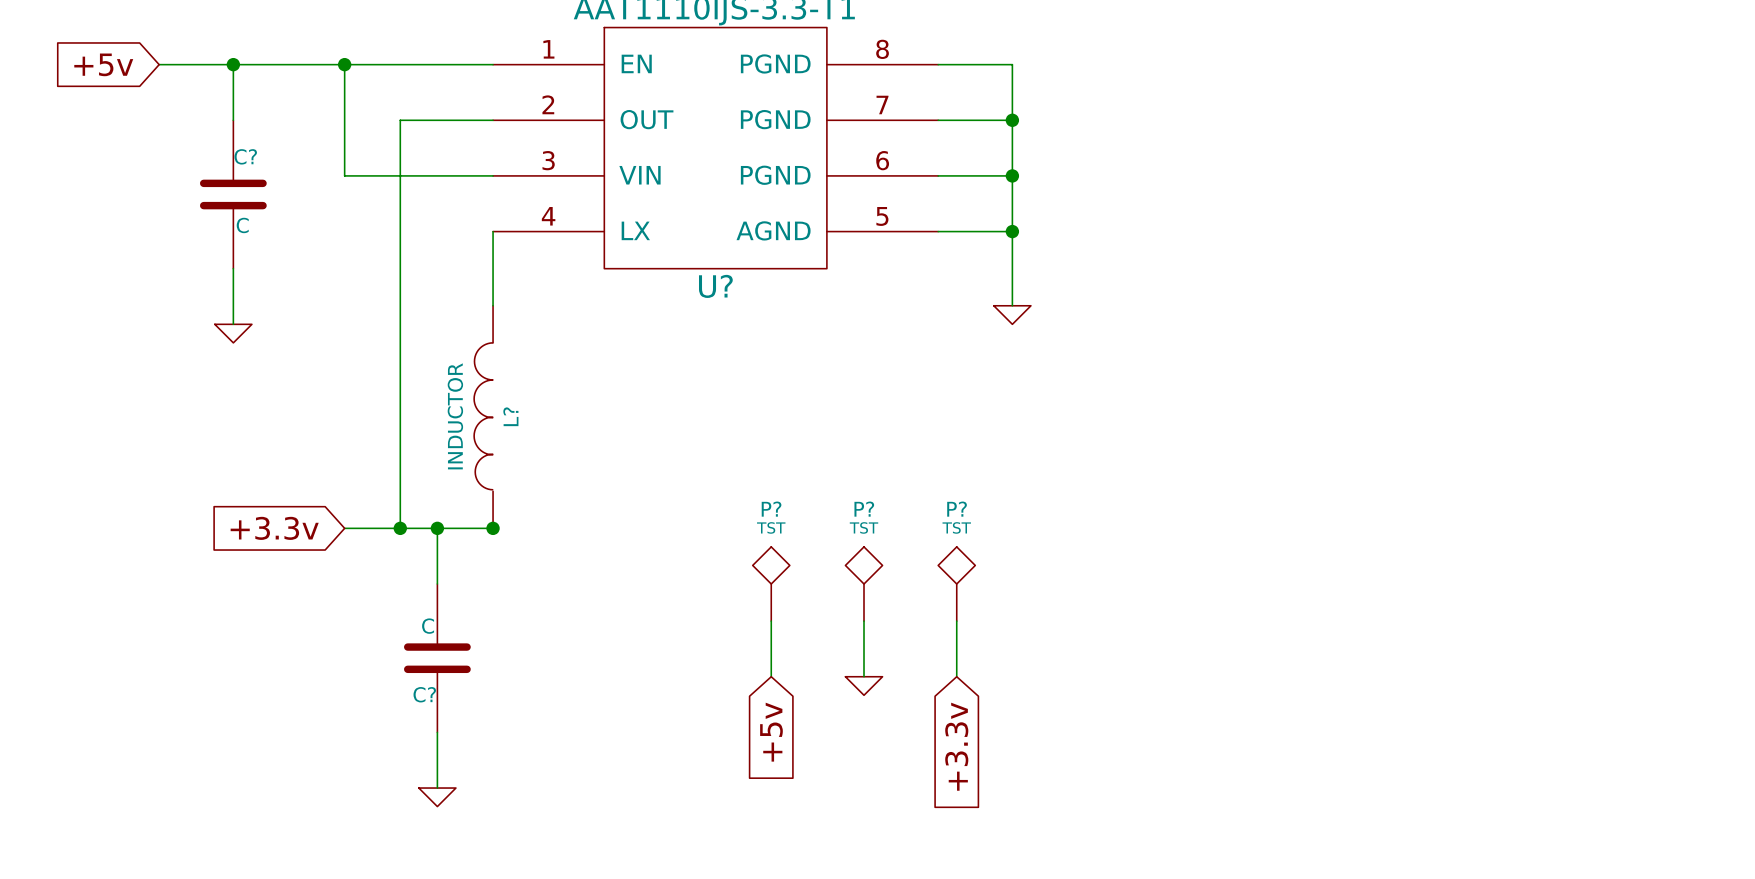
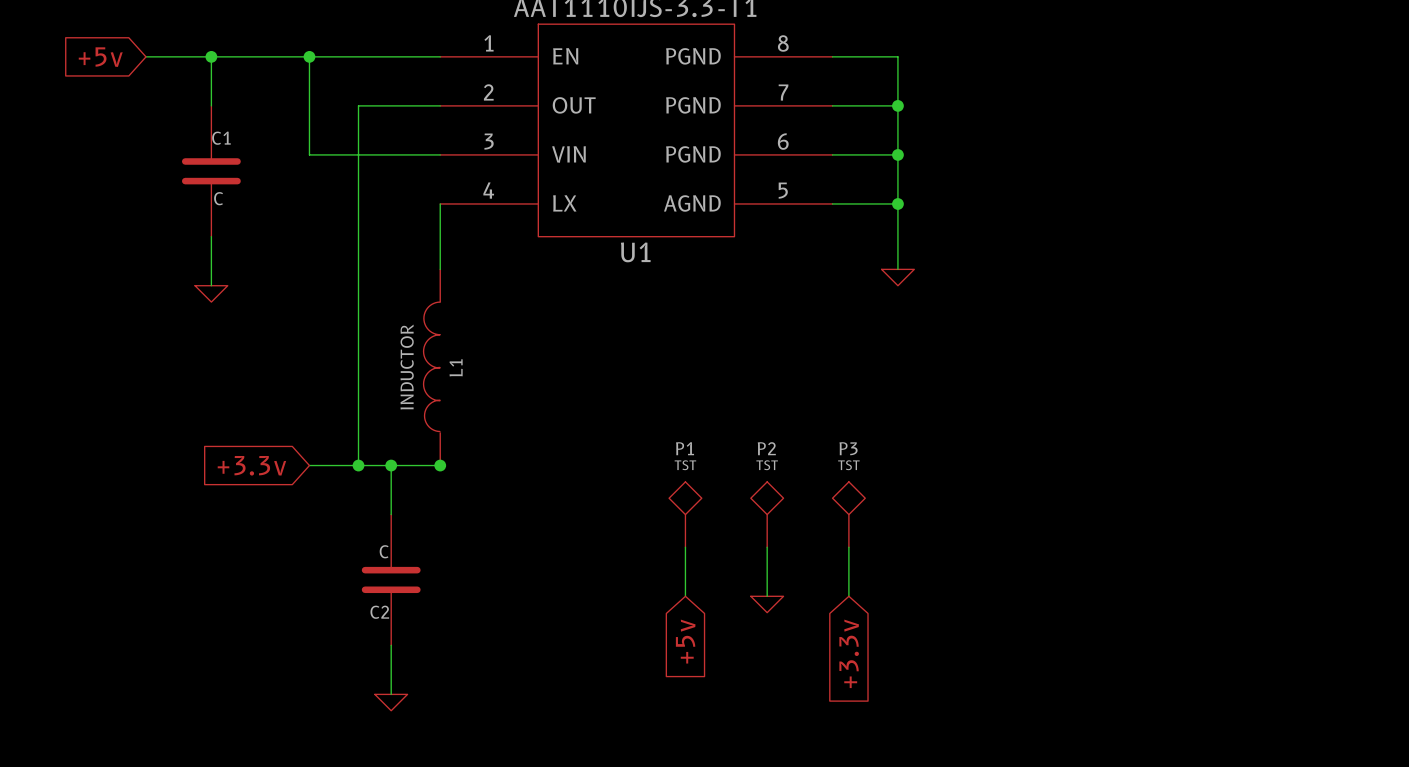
C? name: C? (245, 156) -> C1 (221, 138)
U? name: U? (715, 286) -> U1 (635, 252)
L? name: L? (510, 416) -> L1 (456, 367)
P? name: P? (771, 509) -> P1 (685, 448)
P? name: P? (864, 509) -> P2 (766, 448)
P? name: P? (957, 509) -> P3 (848, 448)
C? name: C? (424, 694) -> C2 (379, 612)

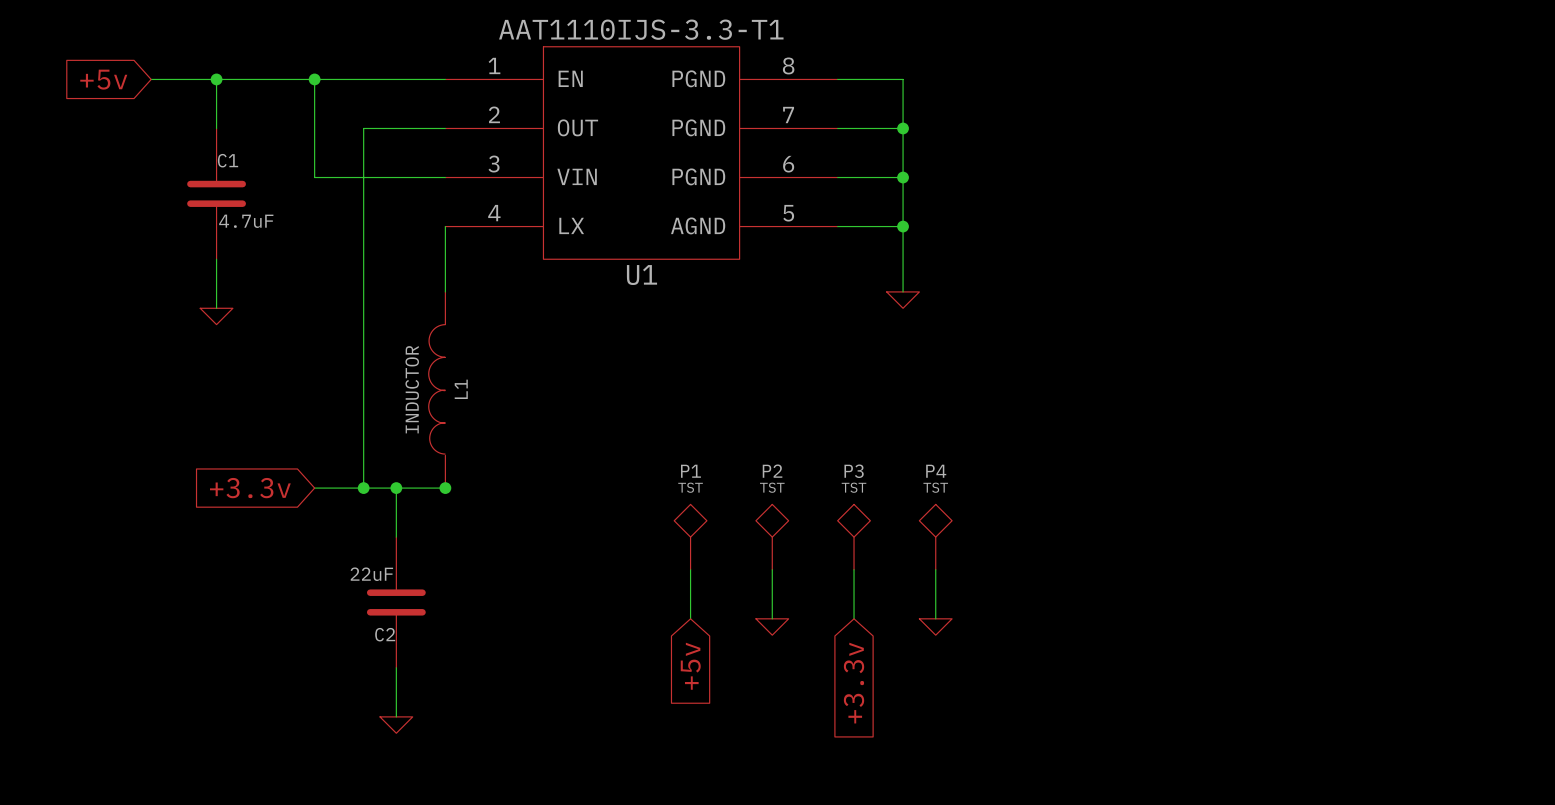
C1 value: C (218, 198) -> 4.7uF (246, 221)
P4: none -> TST (935, 537)
wire: none -> (935, 569) (935, 618)
C2 value: C (384, 551) -> 22uF (371, 574)
power symbol: none -> (935, 627)

